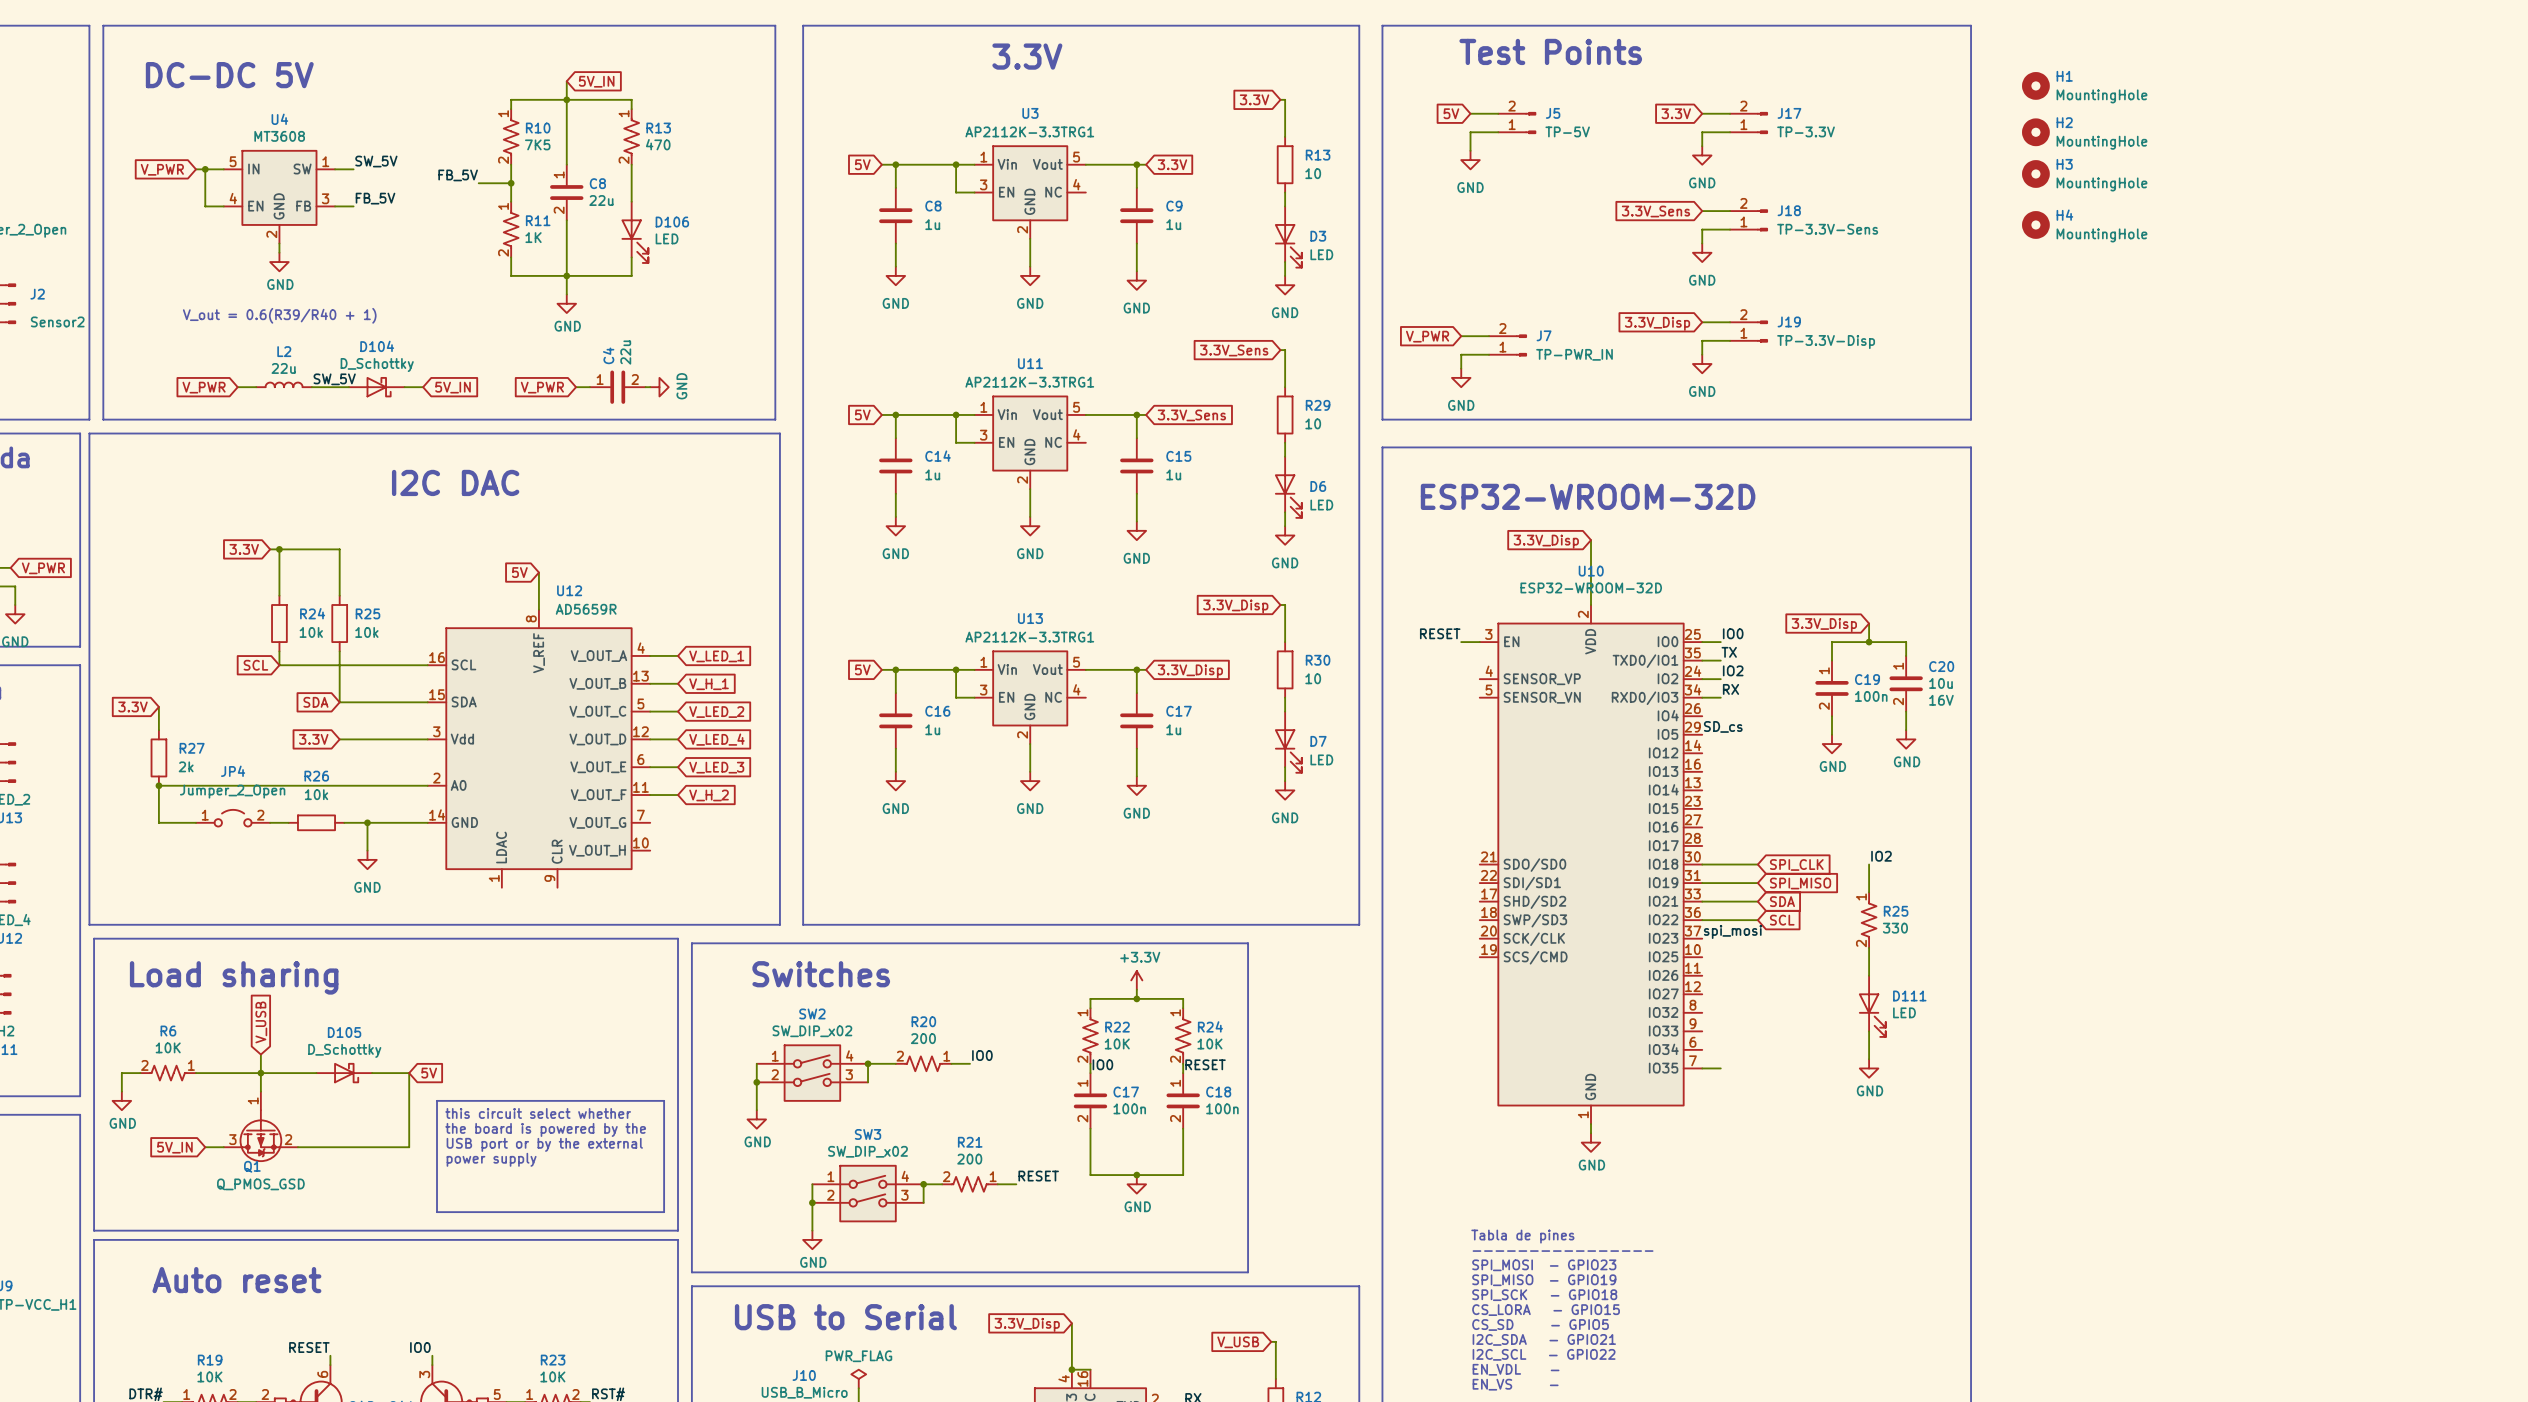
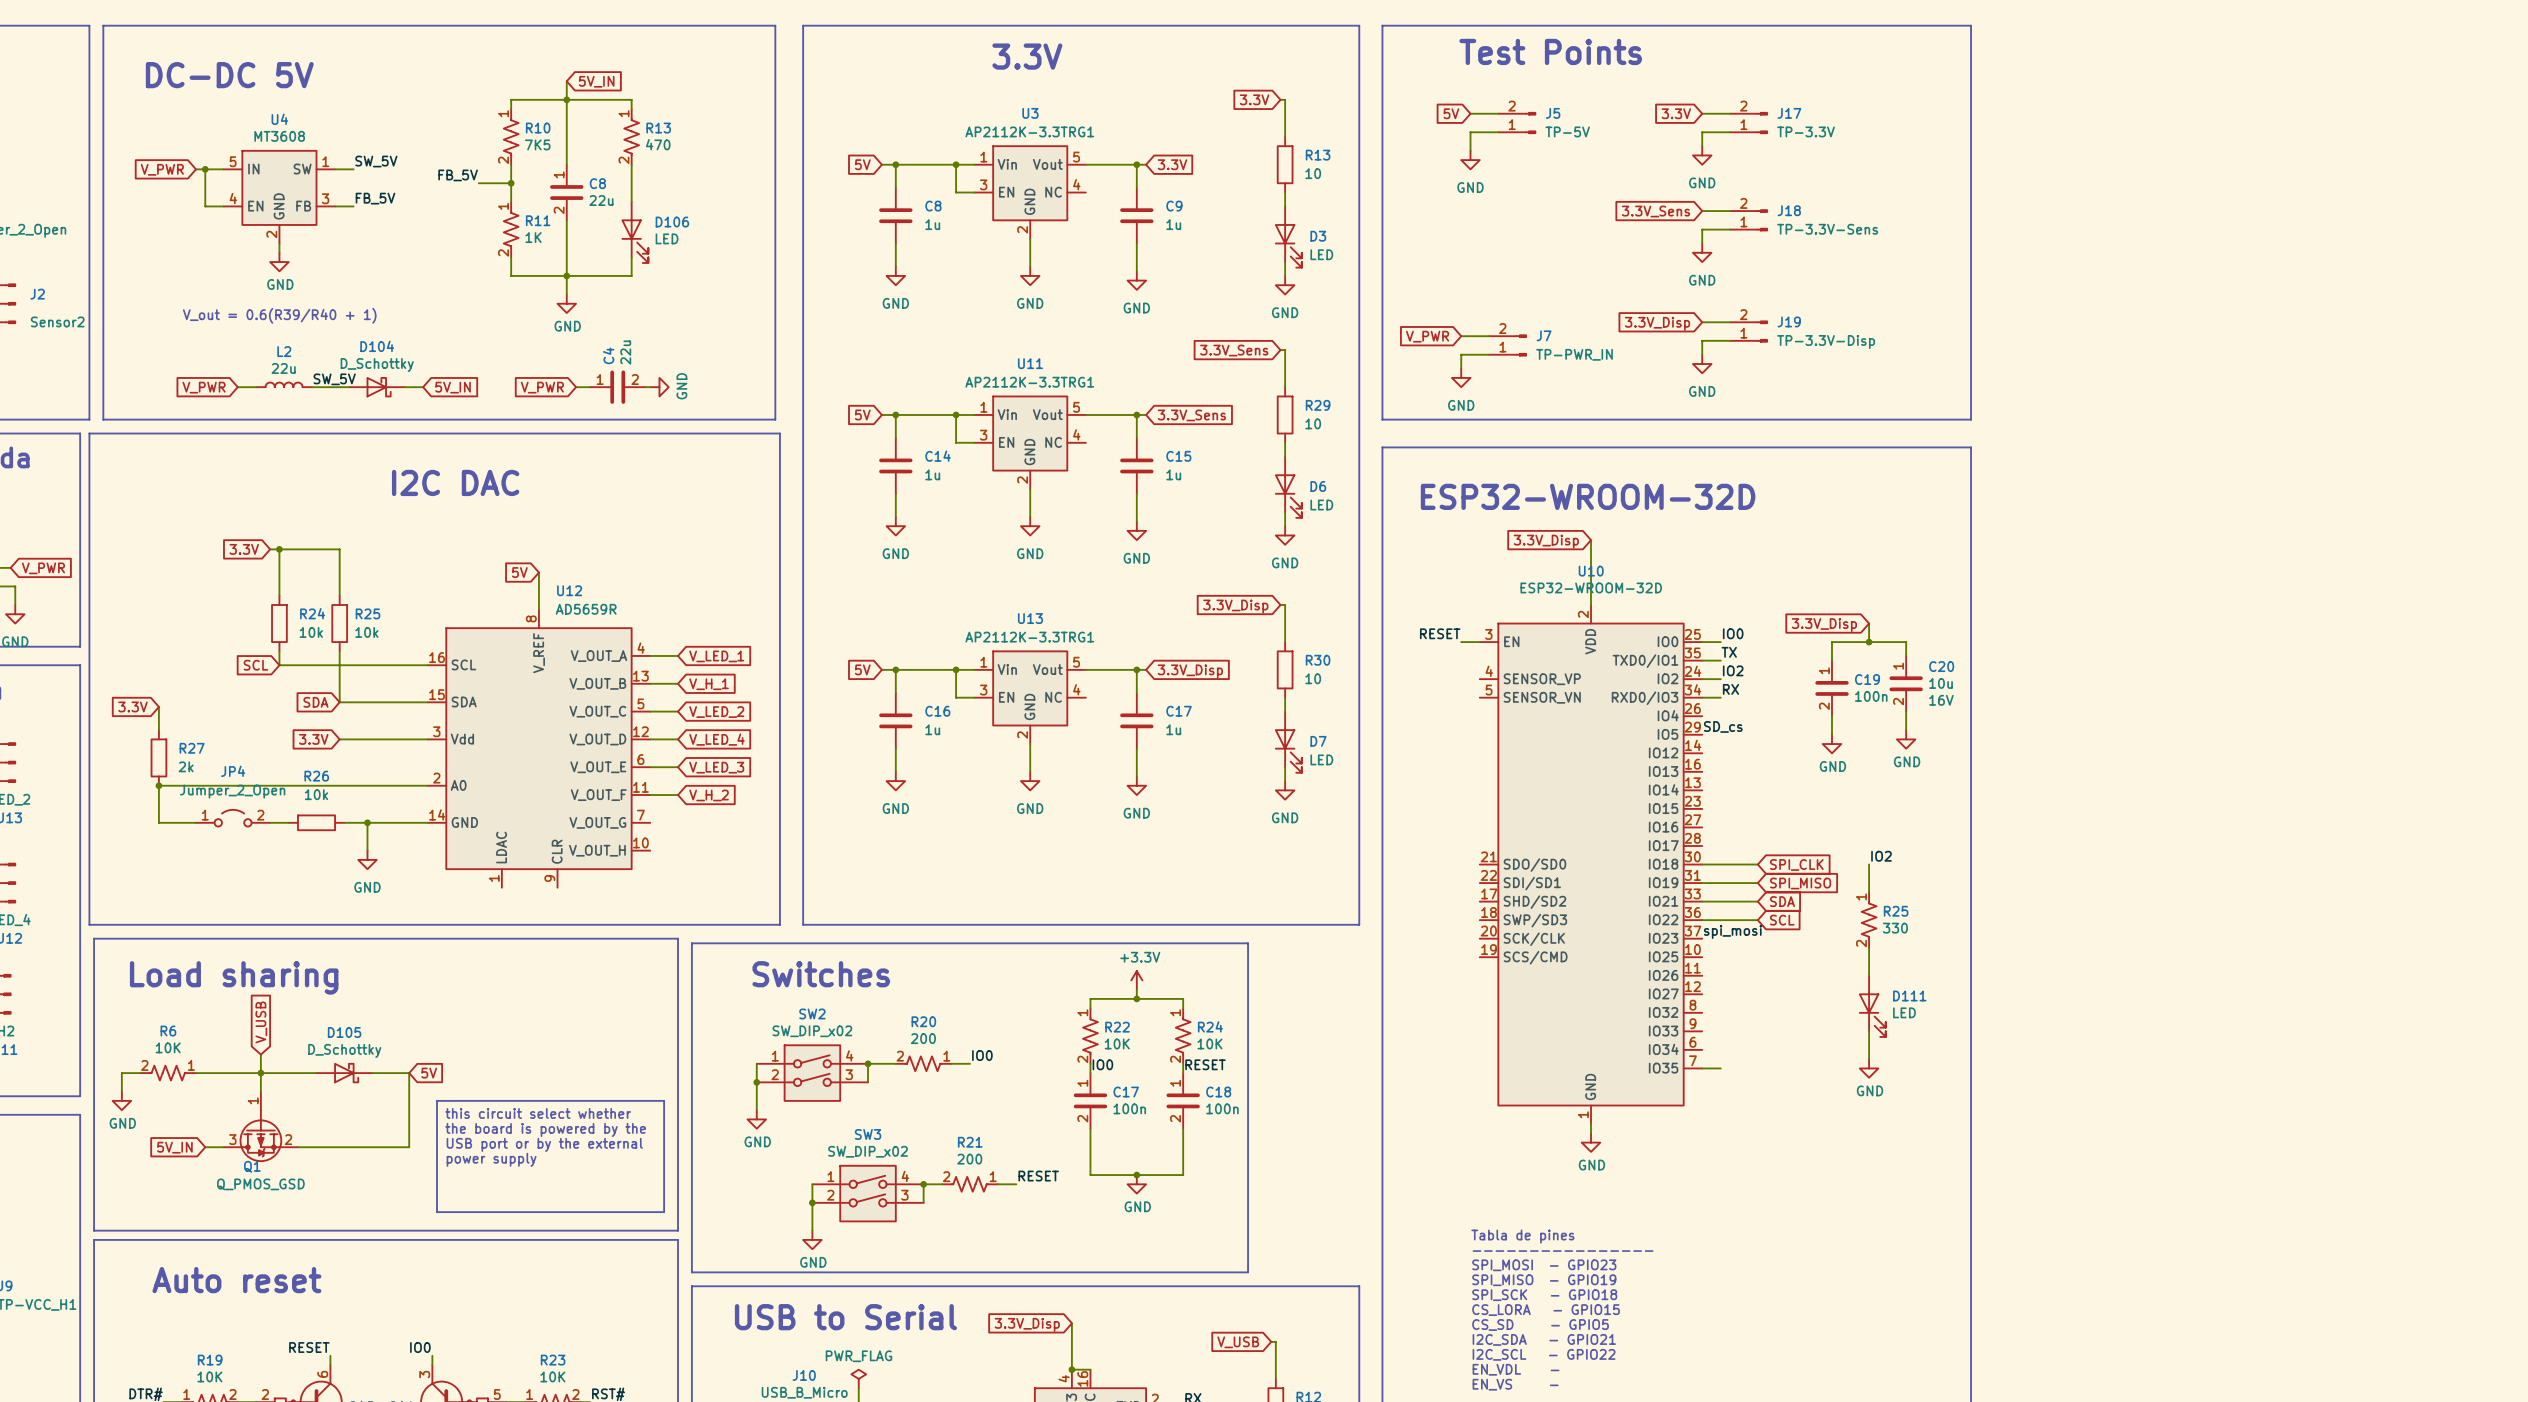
H1: MountingHole (2035, 85) -> none
H2: MountingHole (2035, 132) -> none
H3: MountingHole (2035, 173) -> none
H4: MountingHole (2035, 224) -> none

